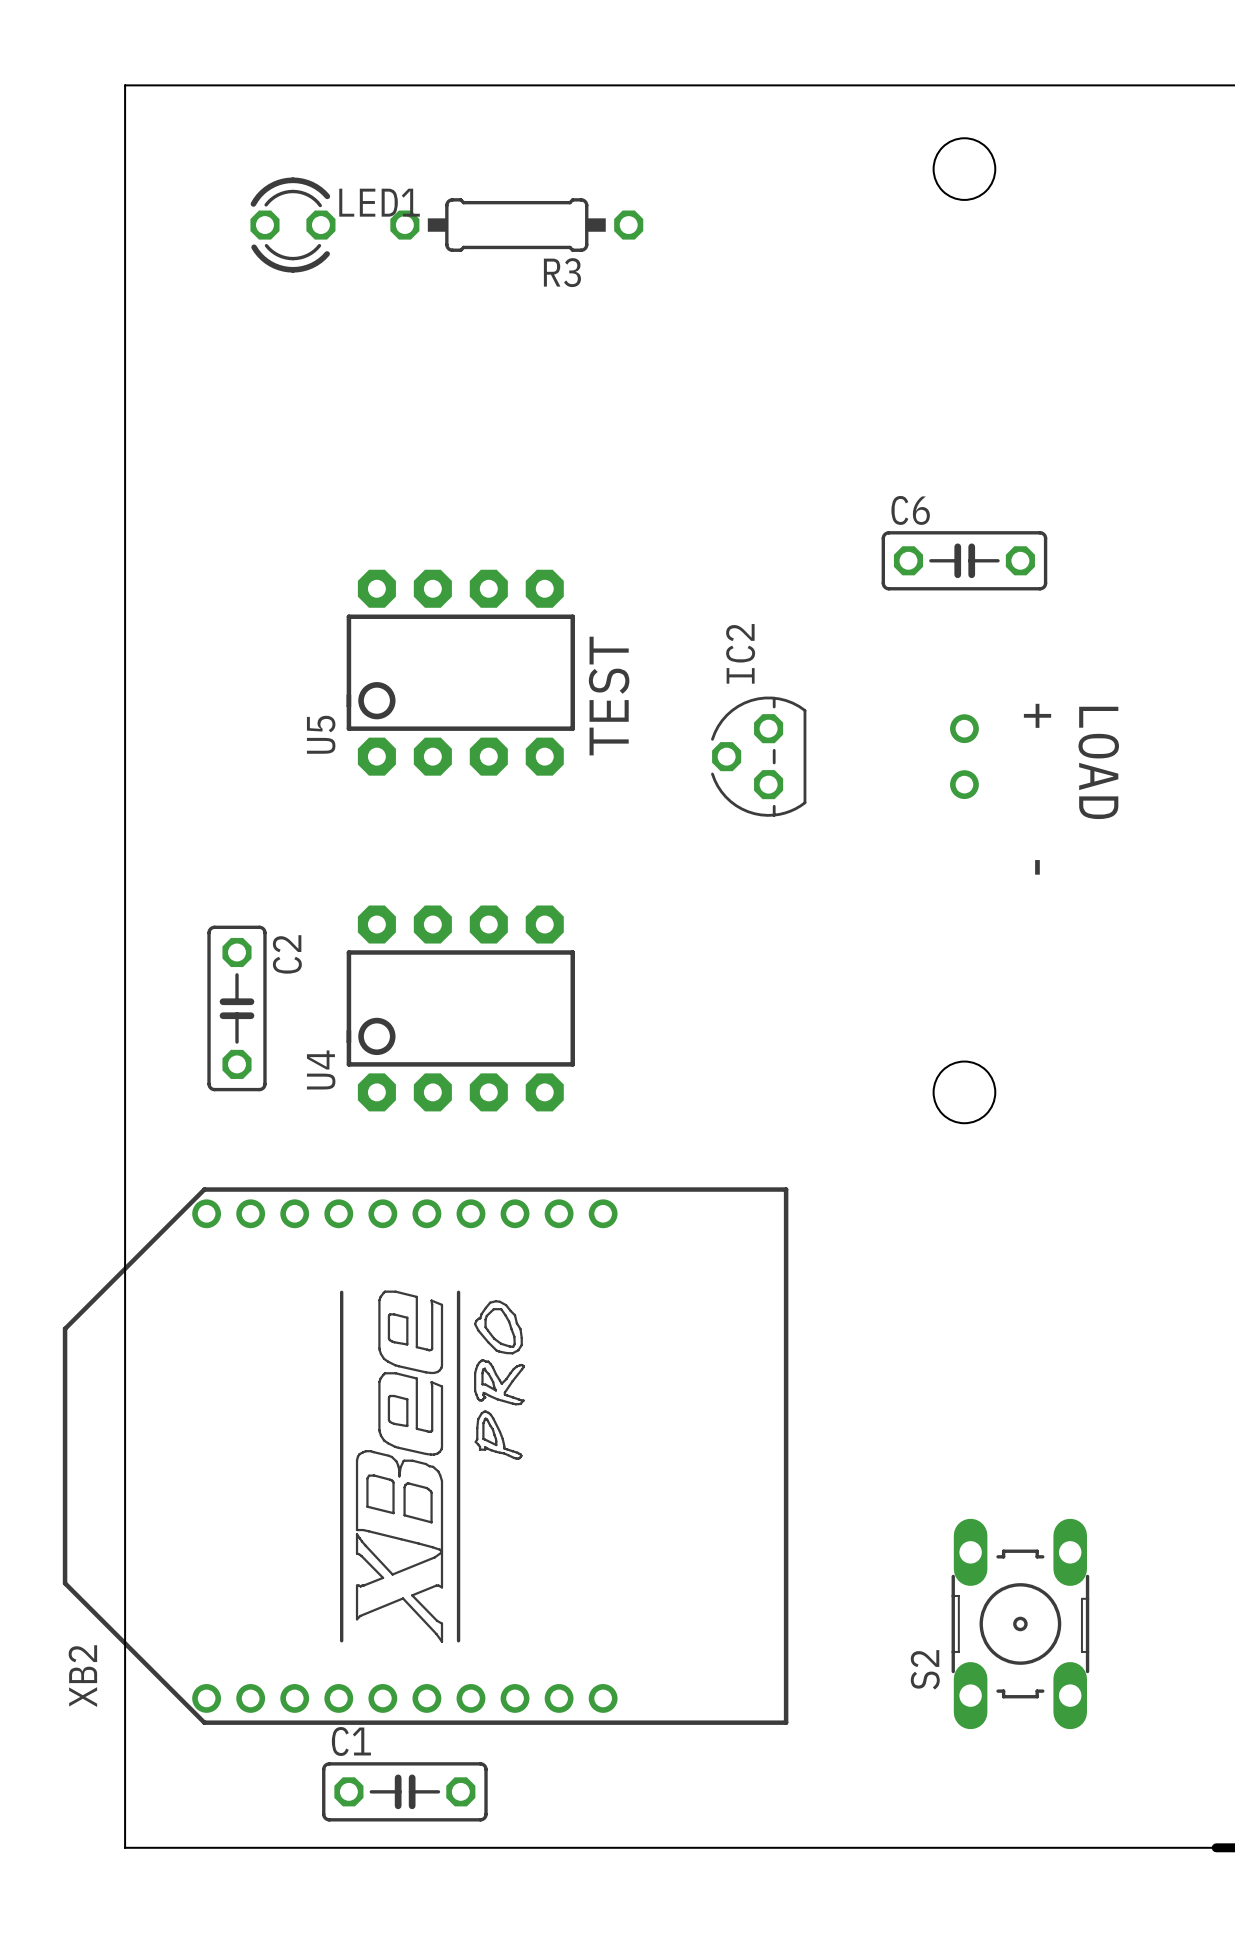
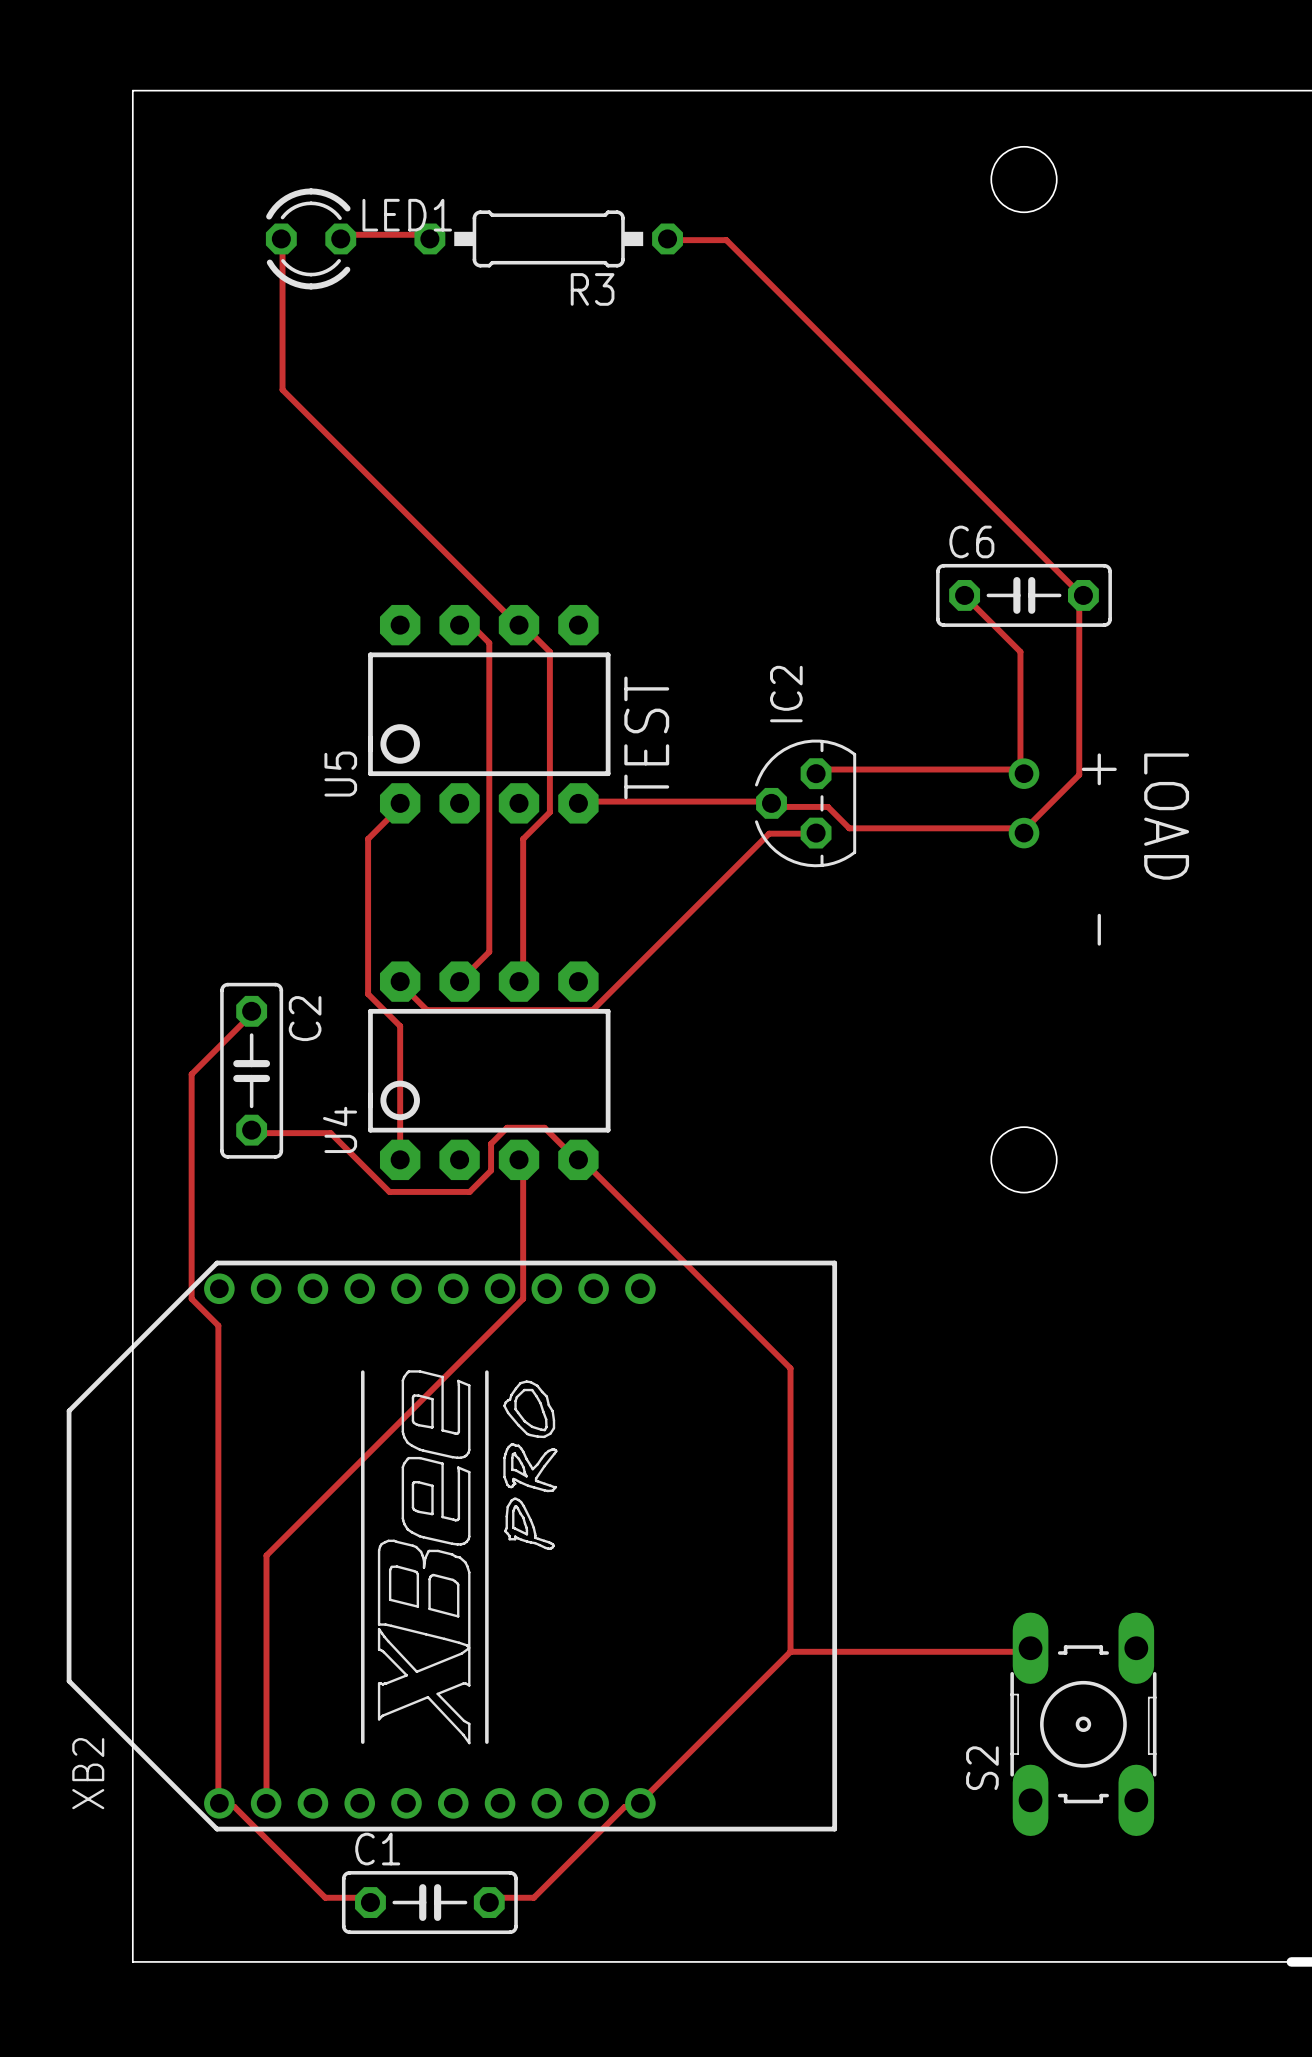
track: none -> (340, 238) (341, 234) (426, 234) (429, 238)
track: none -> (667, 238) (726, 240) (1083, 595) (1079, 598) (1079, 774) (1025, 828) (1024, 833) (1020, 828) (849, 828) (827, 806) (774, 806) (769, 801) (581, 801) (578, 803)
track: none -> (282, 240) (282, 389) (517, 625) (523, 625) (549, 651) (549, 812) (523, 839) (523, 978)
track: none -> (964, 595) (1020, 651) (1020, 769)
track: none -> (459, 625) (471, 625) (489, 642) (489, 951) (459, 981)
track: none -> (1020, 769) (817, 769) (816, 773)
track: none -> (400, 803) (400, 806) (368, 839) (368, 994) (400, 1026) (400, 1159)
track: none -> (816, 833) (769, 833) (592, 1010) (426, 1010) (400, 981)
track: none -> (251, 1011) (250, 1015) (191, 1074) (191, 1298) (218, 1325) (218, 1801) (223, 1806) (234, 1806) (325, 1897) (368, 1897) (370, 1902)
track: none -> (251, 1130) (255, 1133) (330, 1133) (389, 1191) (469, 1191) (491, 1170) (491, 1143) (507, 1127) (544, 1127) (576, 1159) (581, 1159) (790, 1368) (790, 1651)
track: none -> (519, 1159) (523, 1159) (523, 1298) (266, 1555) (266, 1803)
track: none -> (1030, 1648) (1025, 1651) (790, 1651)
track: none -> (790, 1651) (640, 1803) (635, 1806) (624, 1806) (533, 1897) (491, 1897) (489, 1902)

